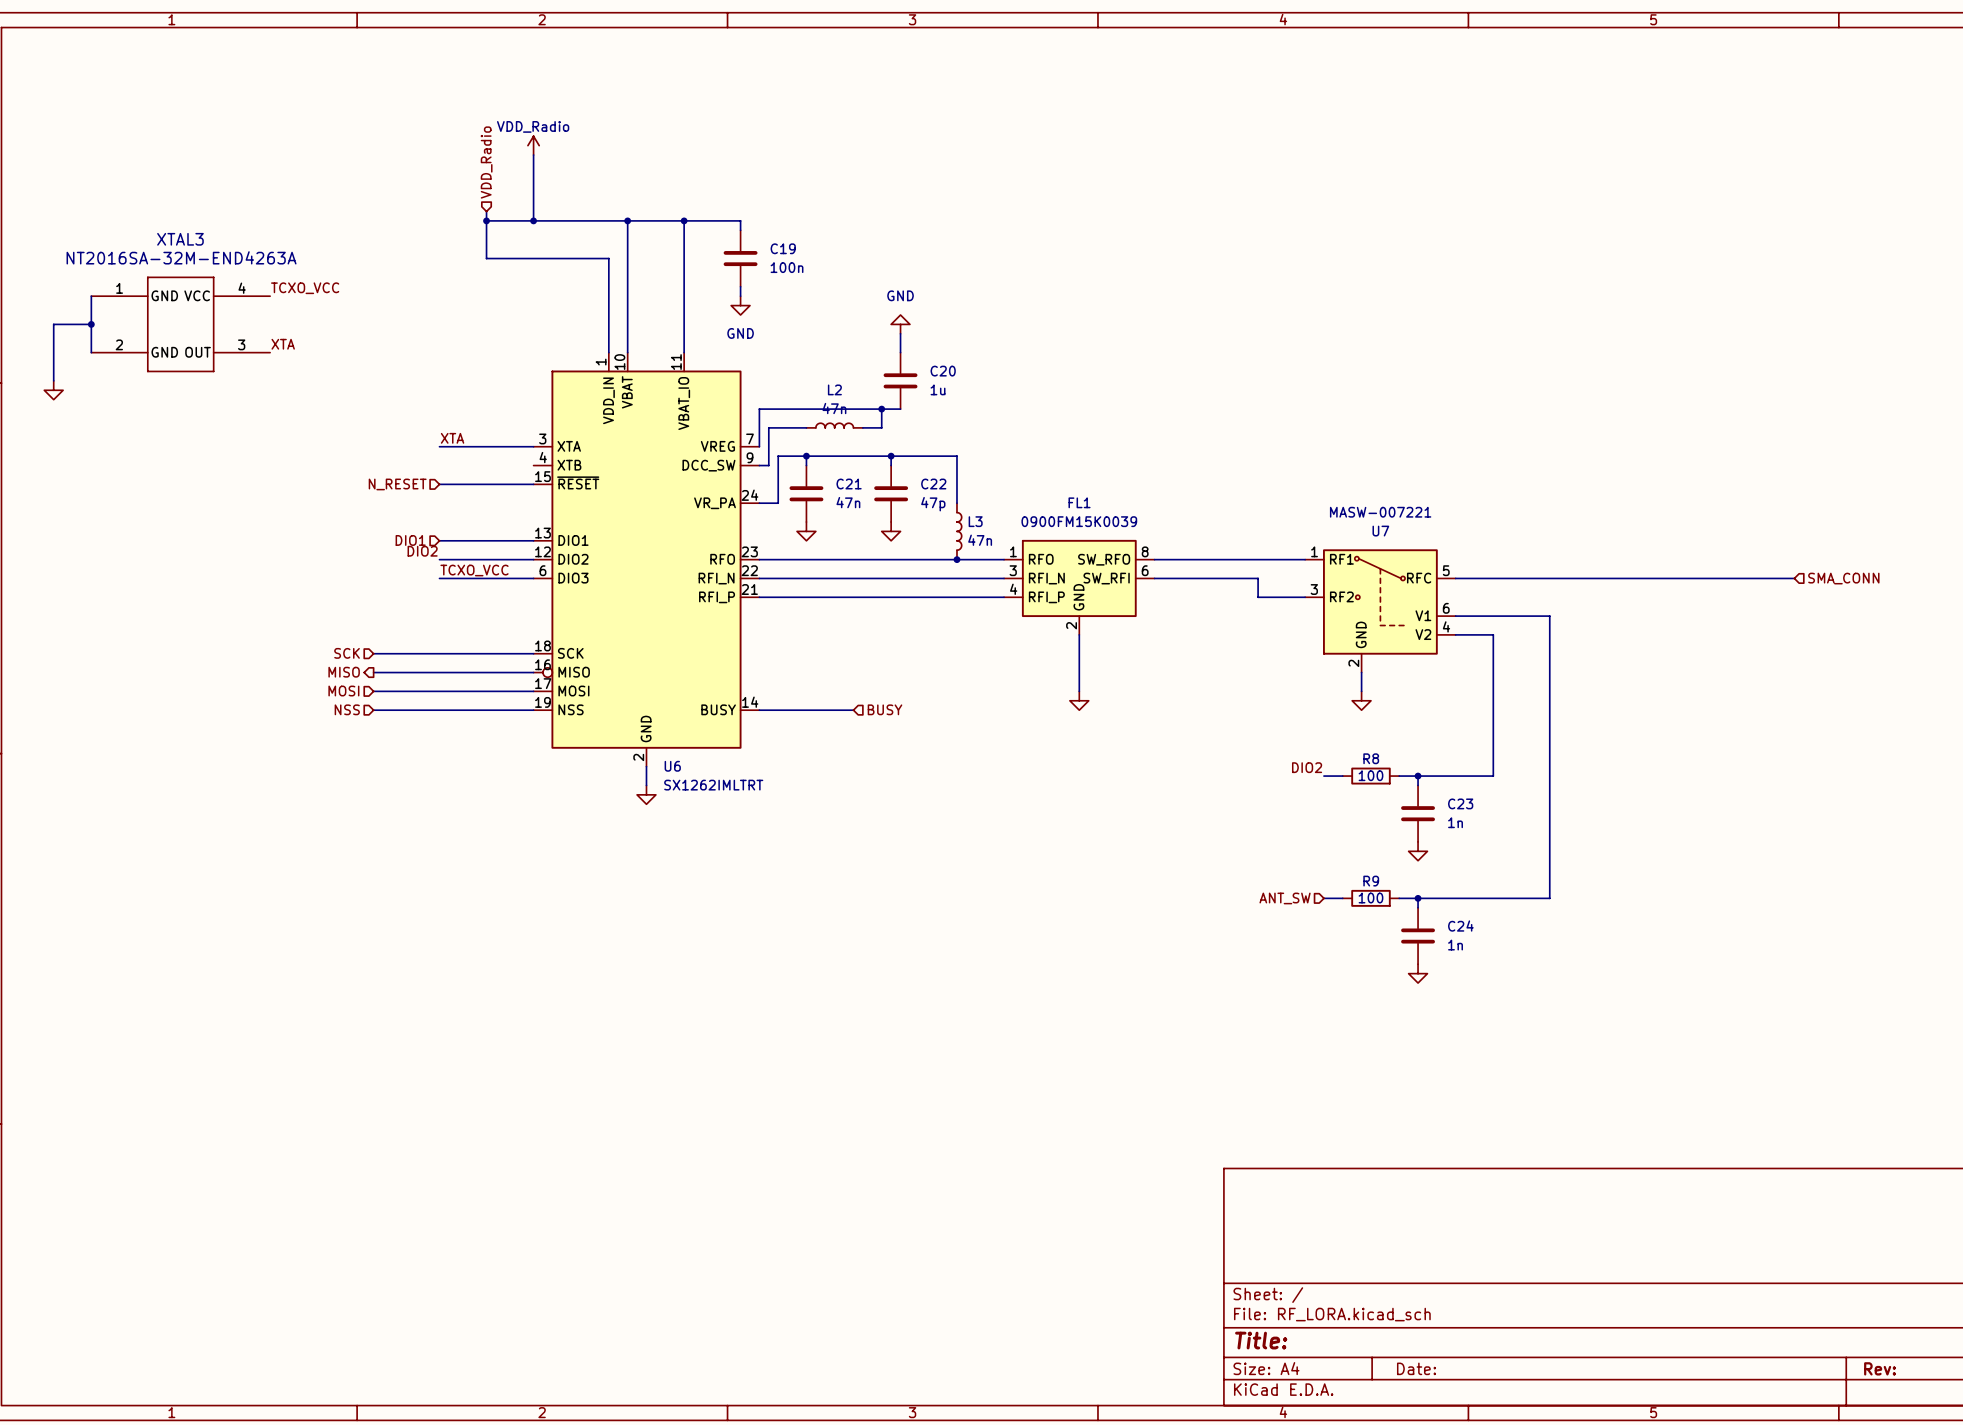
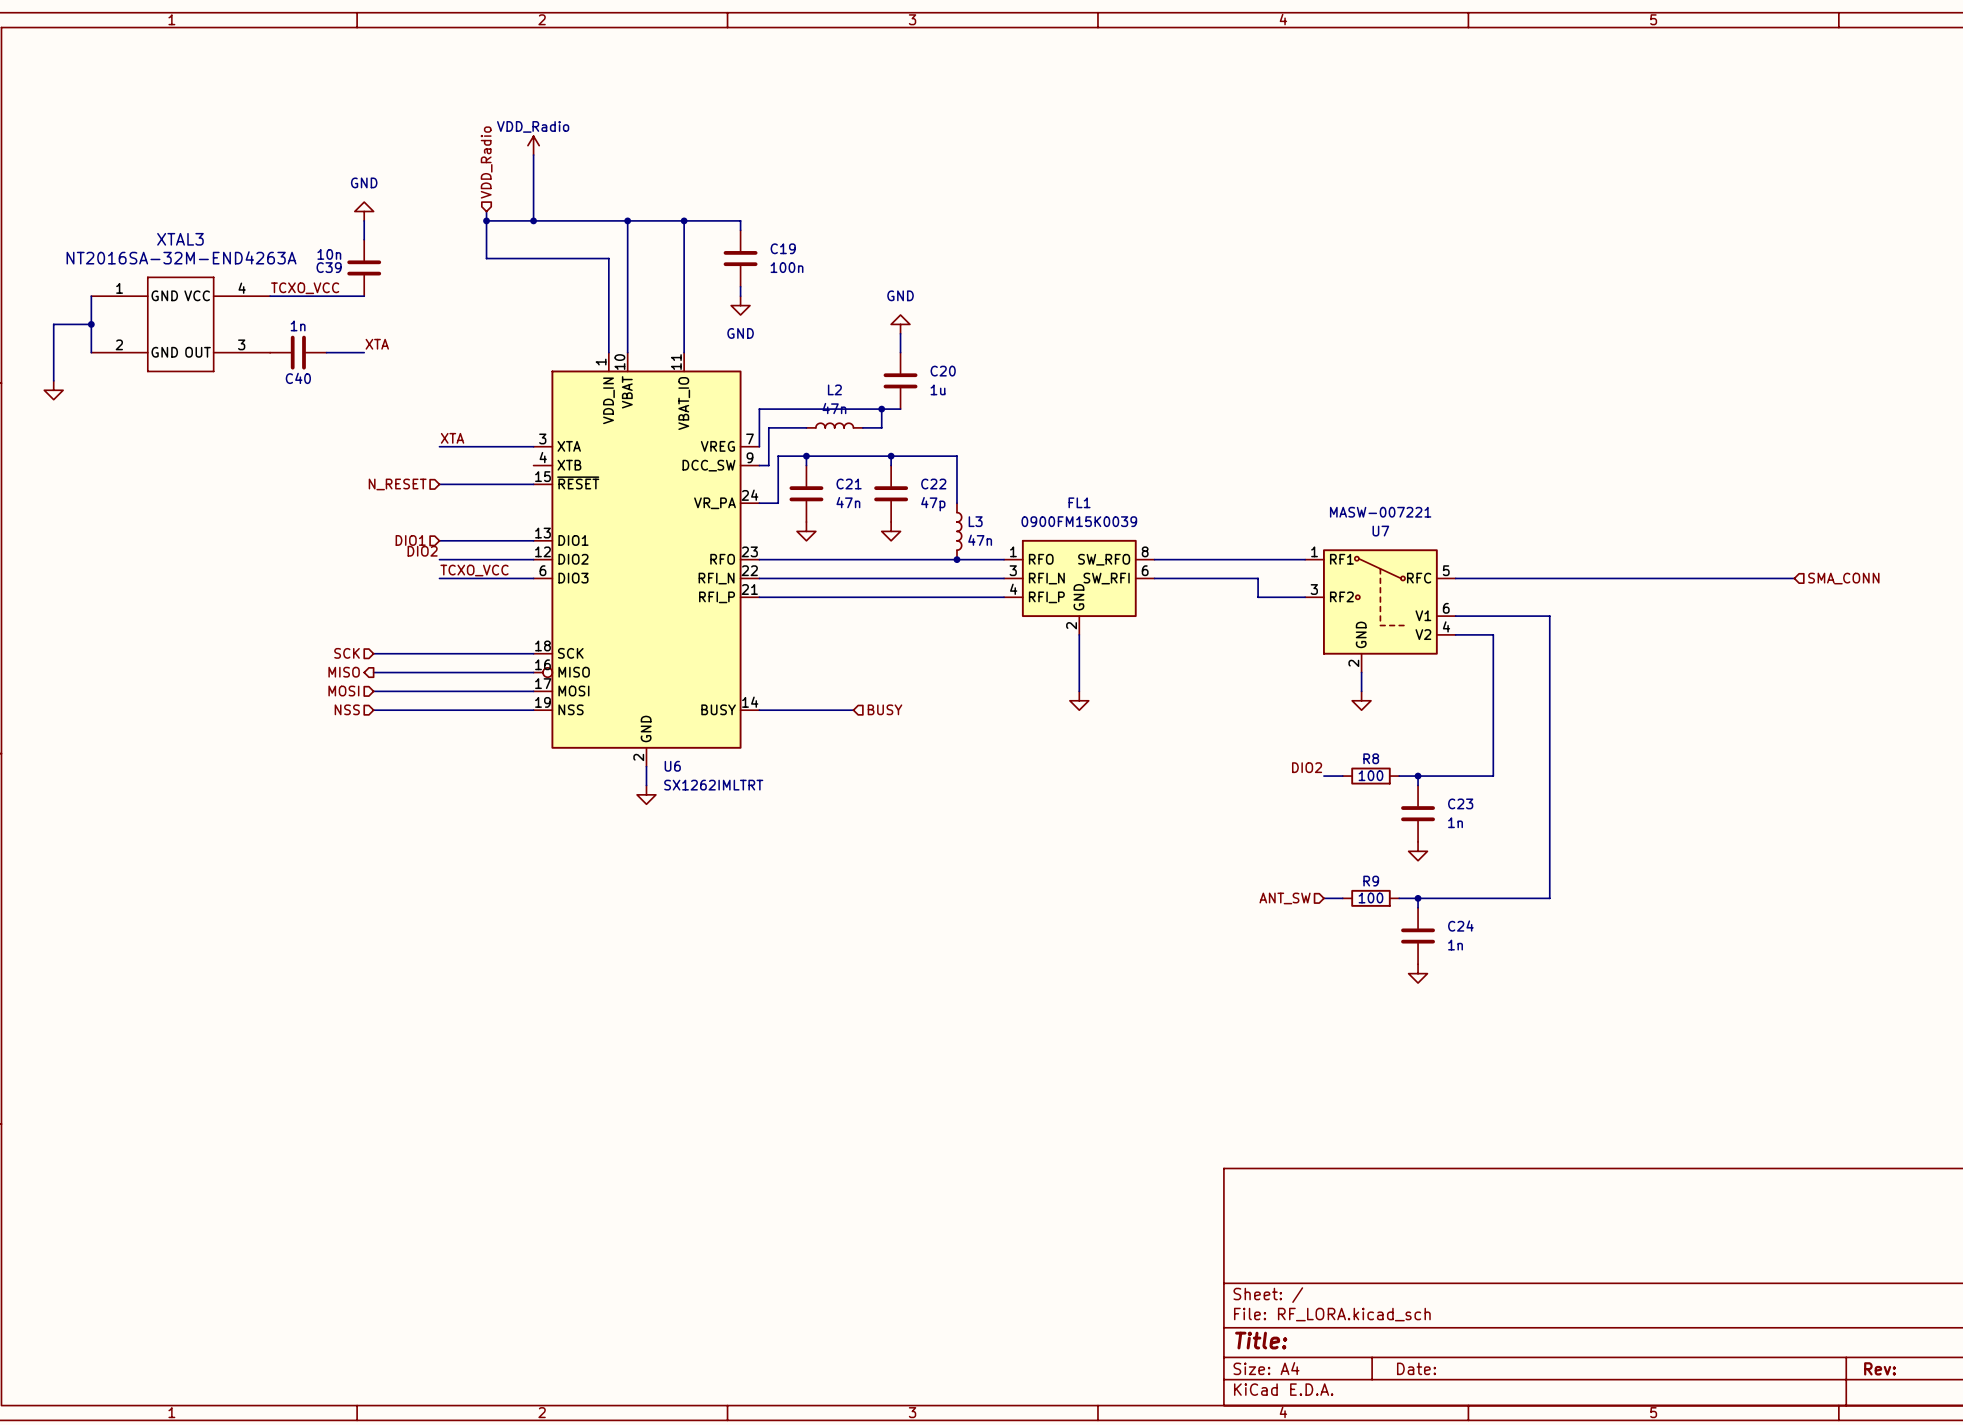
power symbol: none -> GND (364, 211)
wire: none -> (364, 220) (364, 239)
C39: none -> 10n (364, 267)
wire: none -> (270, 296) (364, 296)
label position: XTA (283, 344) -> XTA (377, 344)
C40: none -> 1n (298, 352)
wire: none -> (326, 352) (364, 352)

